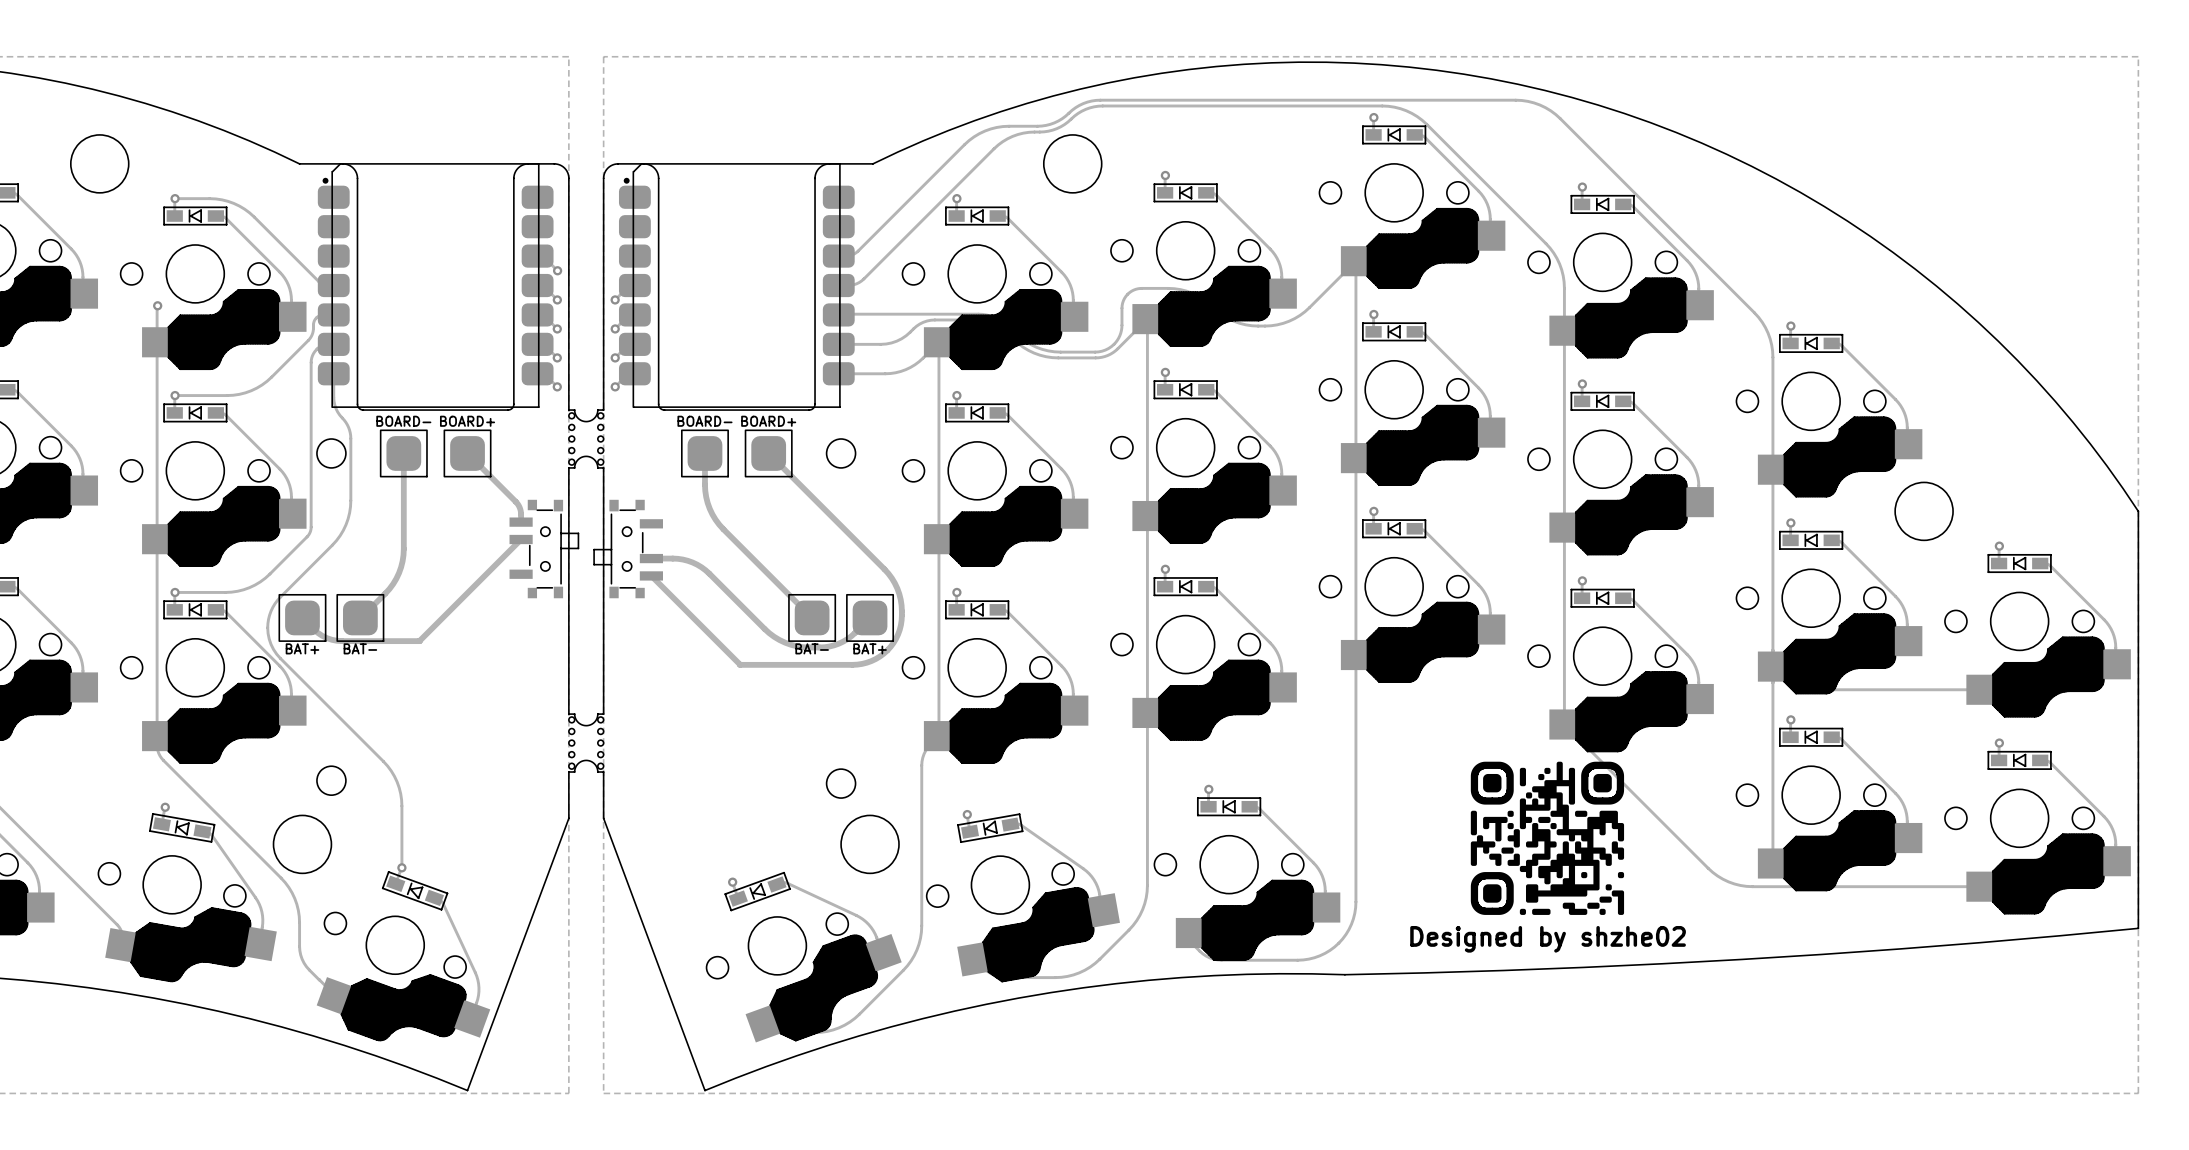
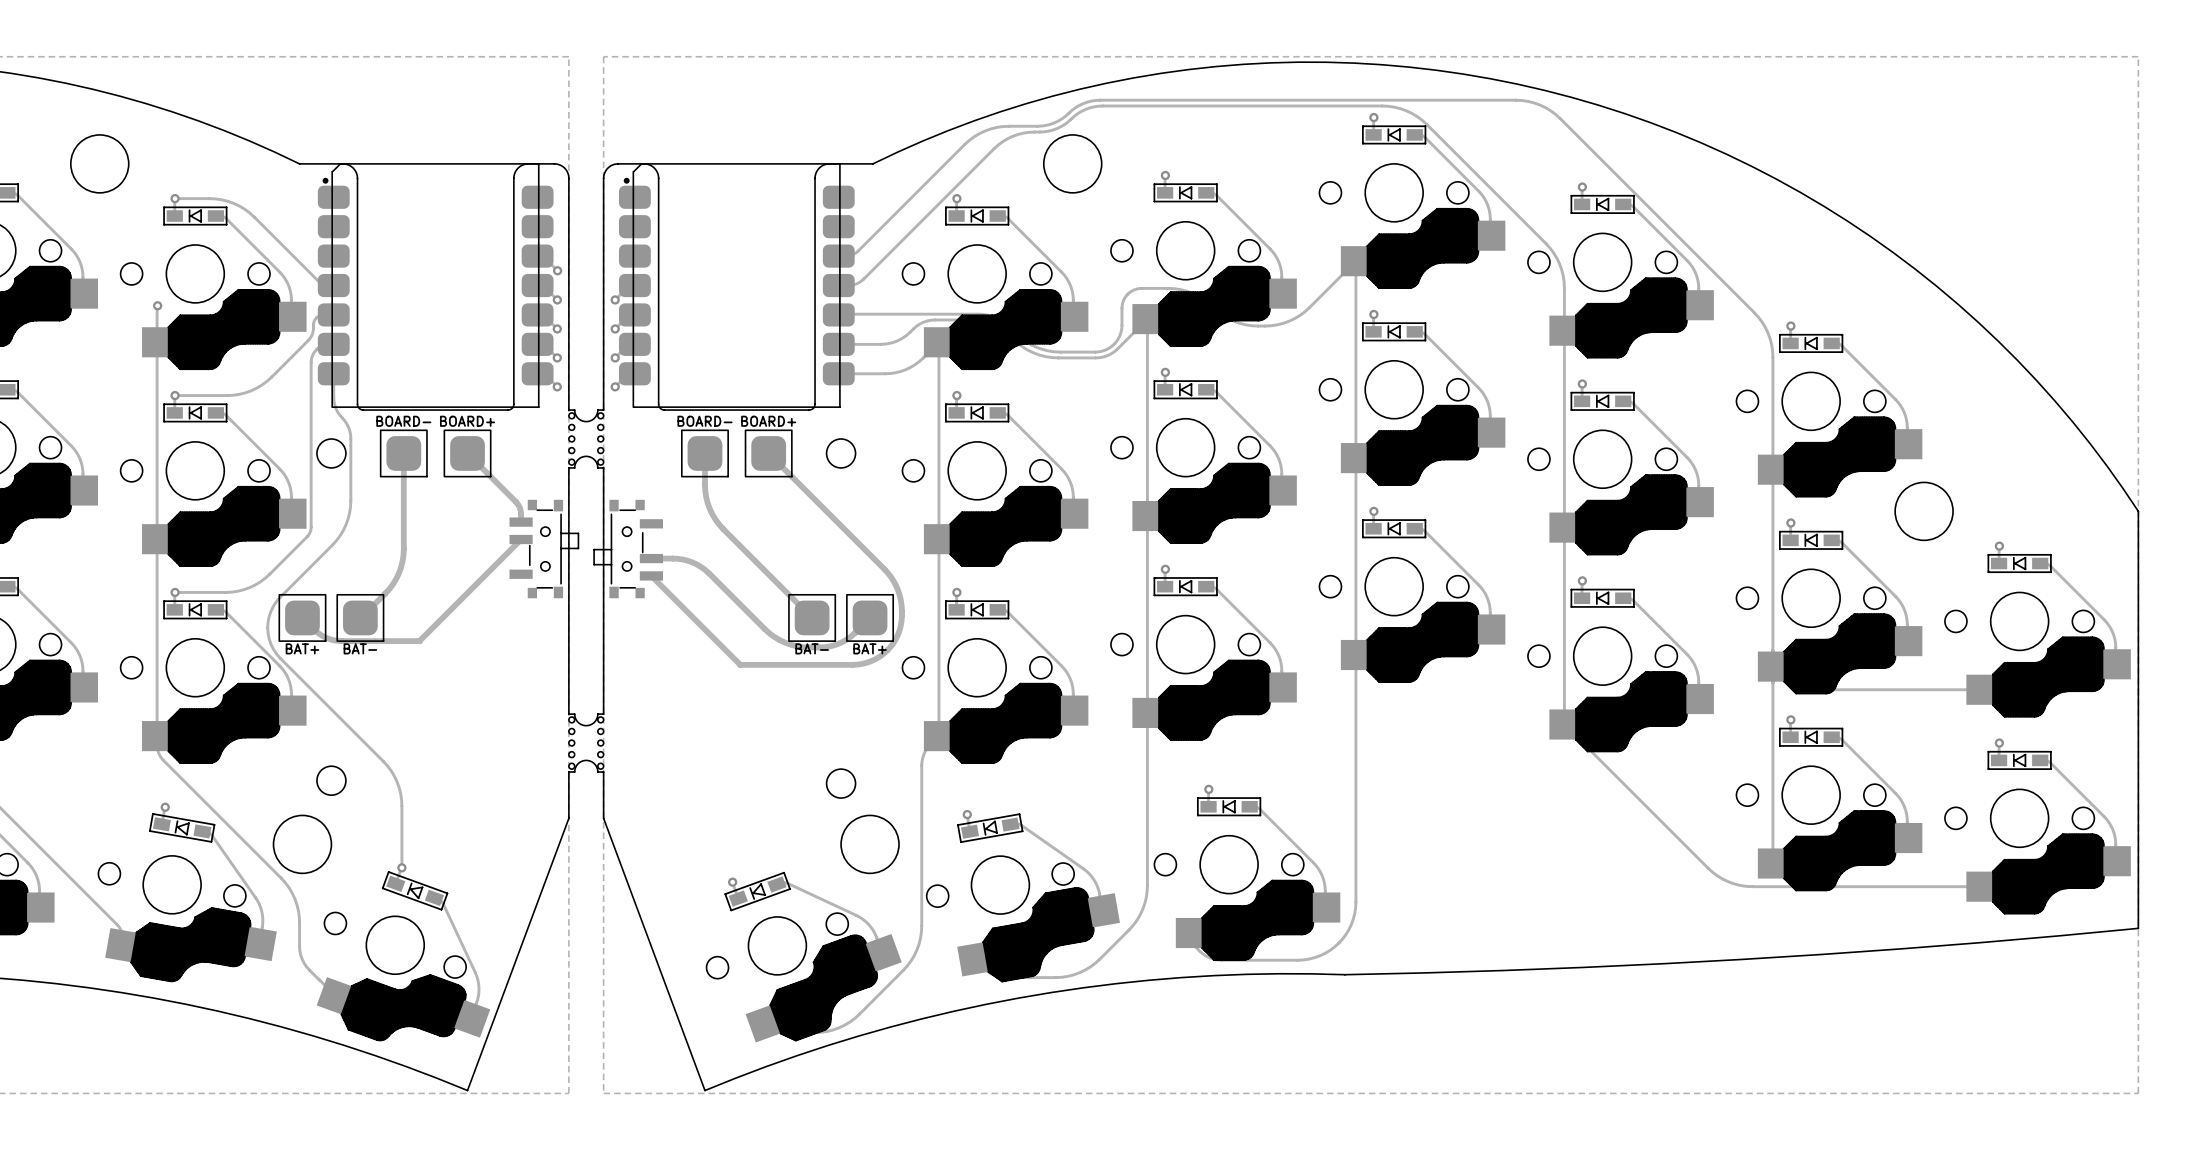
drawing: [1470, 761, 1625, 915] -> none
line: (1499, 768) (1484, 768) (1478, 771) (1477, 790) (1480, 796) (1499, 798) (1505, 794) (1507, 774) (1504, 770) (1499, 768) -> none
line: (1610, 768) (1614, 770) (1617, 774) (1616, 794) (1610, 798) (1591, 796) (1587, 790) (1588, 771) (1594, 768) (1610, 768) -> none
line: (1499, 878) (1504, 880) (1507, 884) (1506, 904) (1499, 908) (1480, 907) (1477, 901) (1478, 882) (1483, 878) (1499, 878) -> none
text: Designed by shzhe02 (1548, 939) -> none

